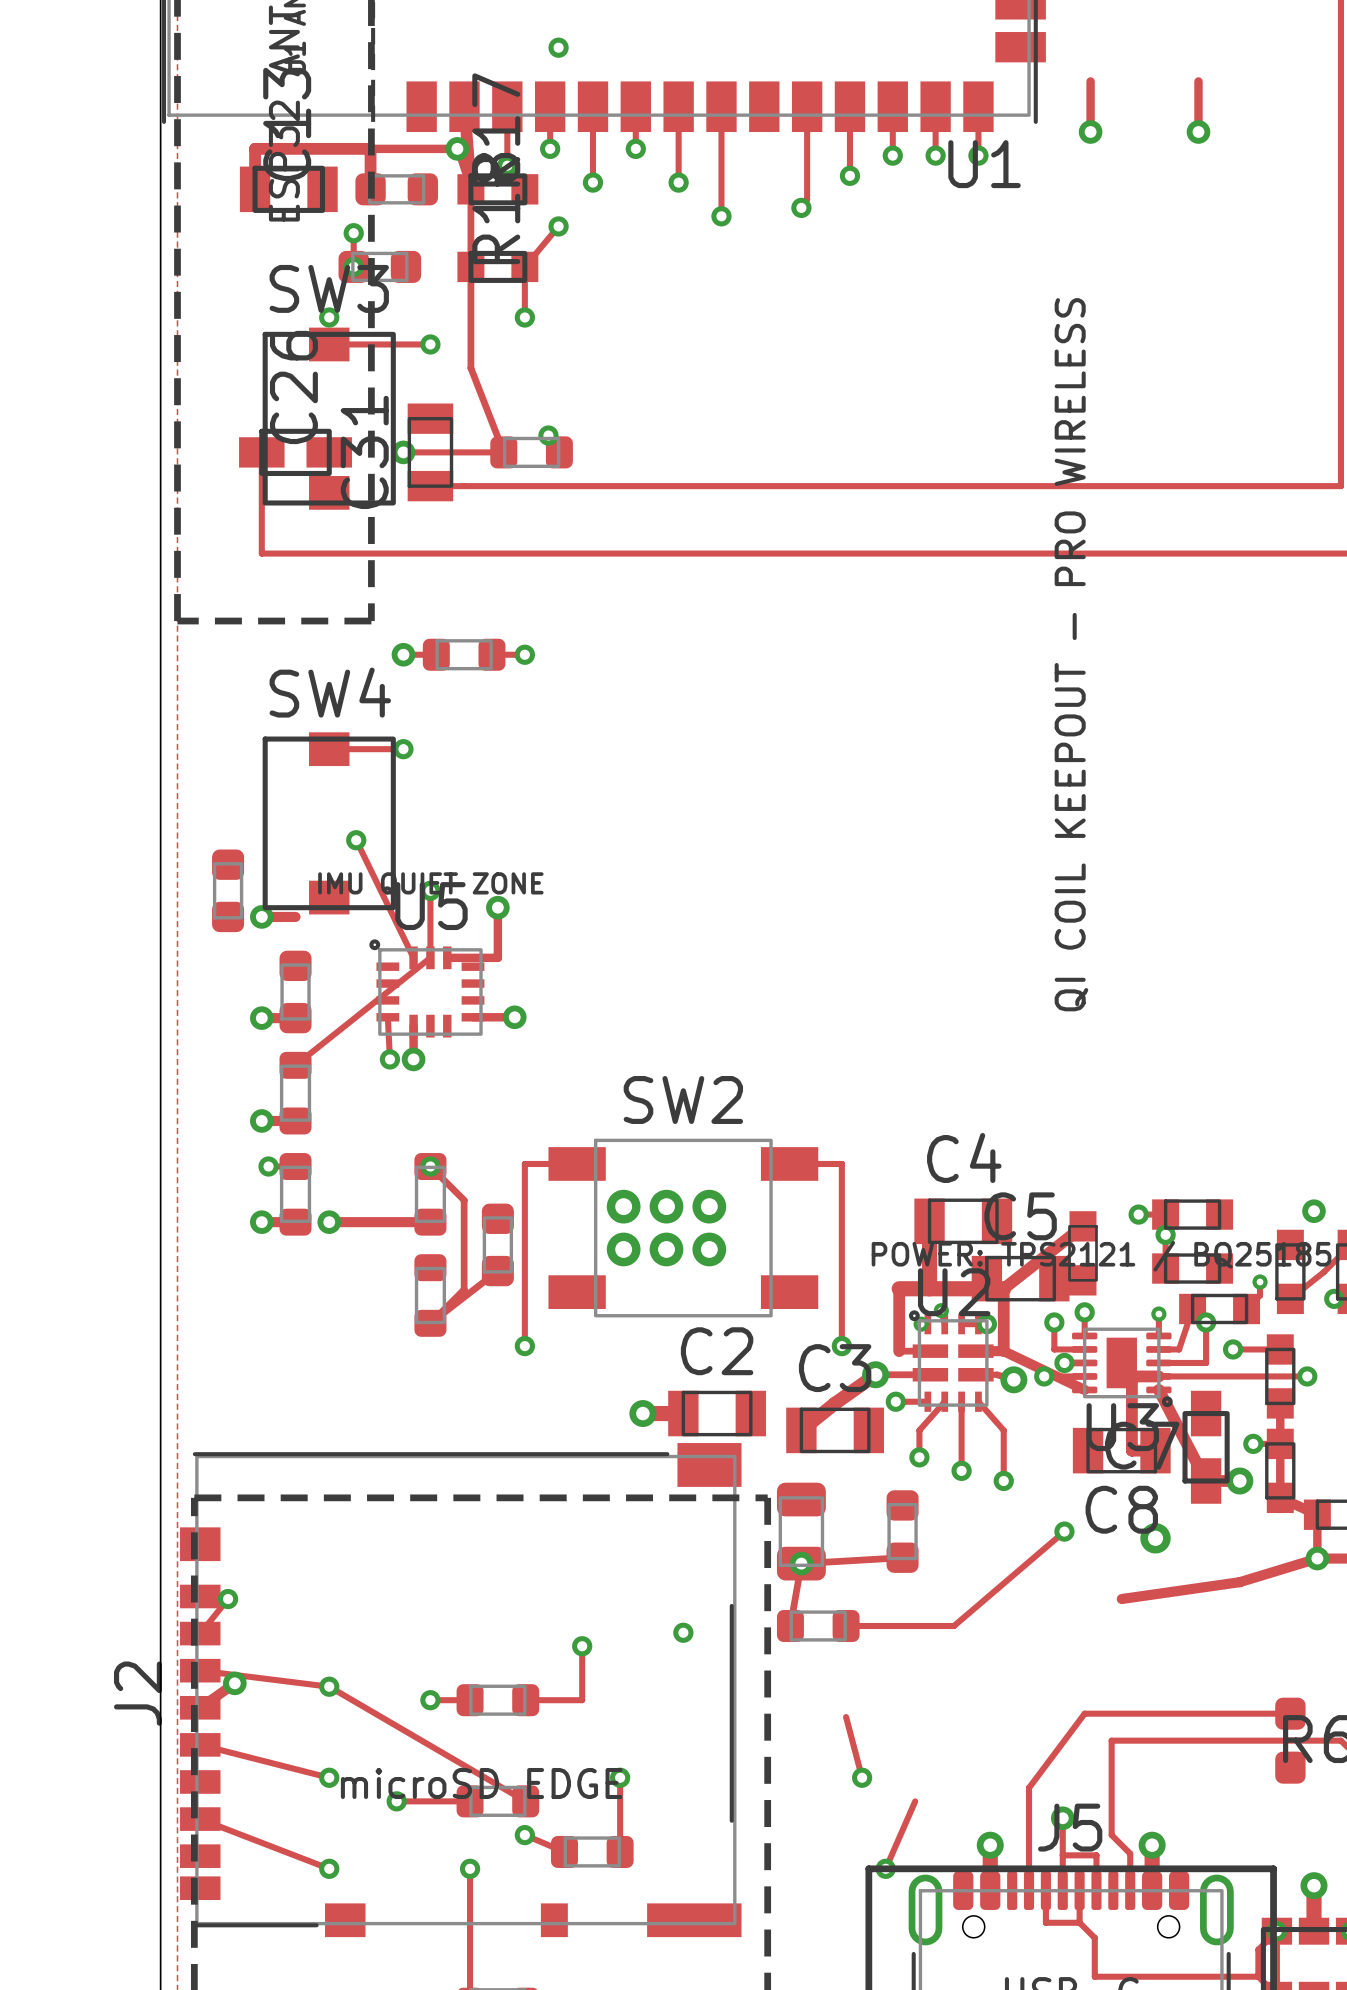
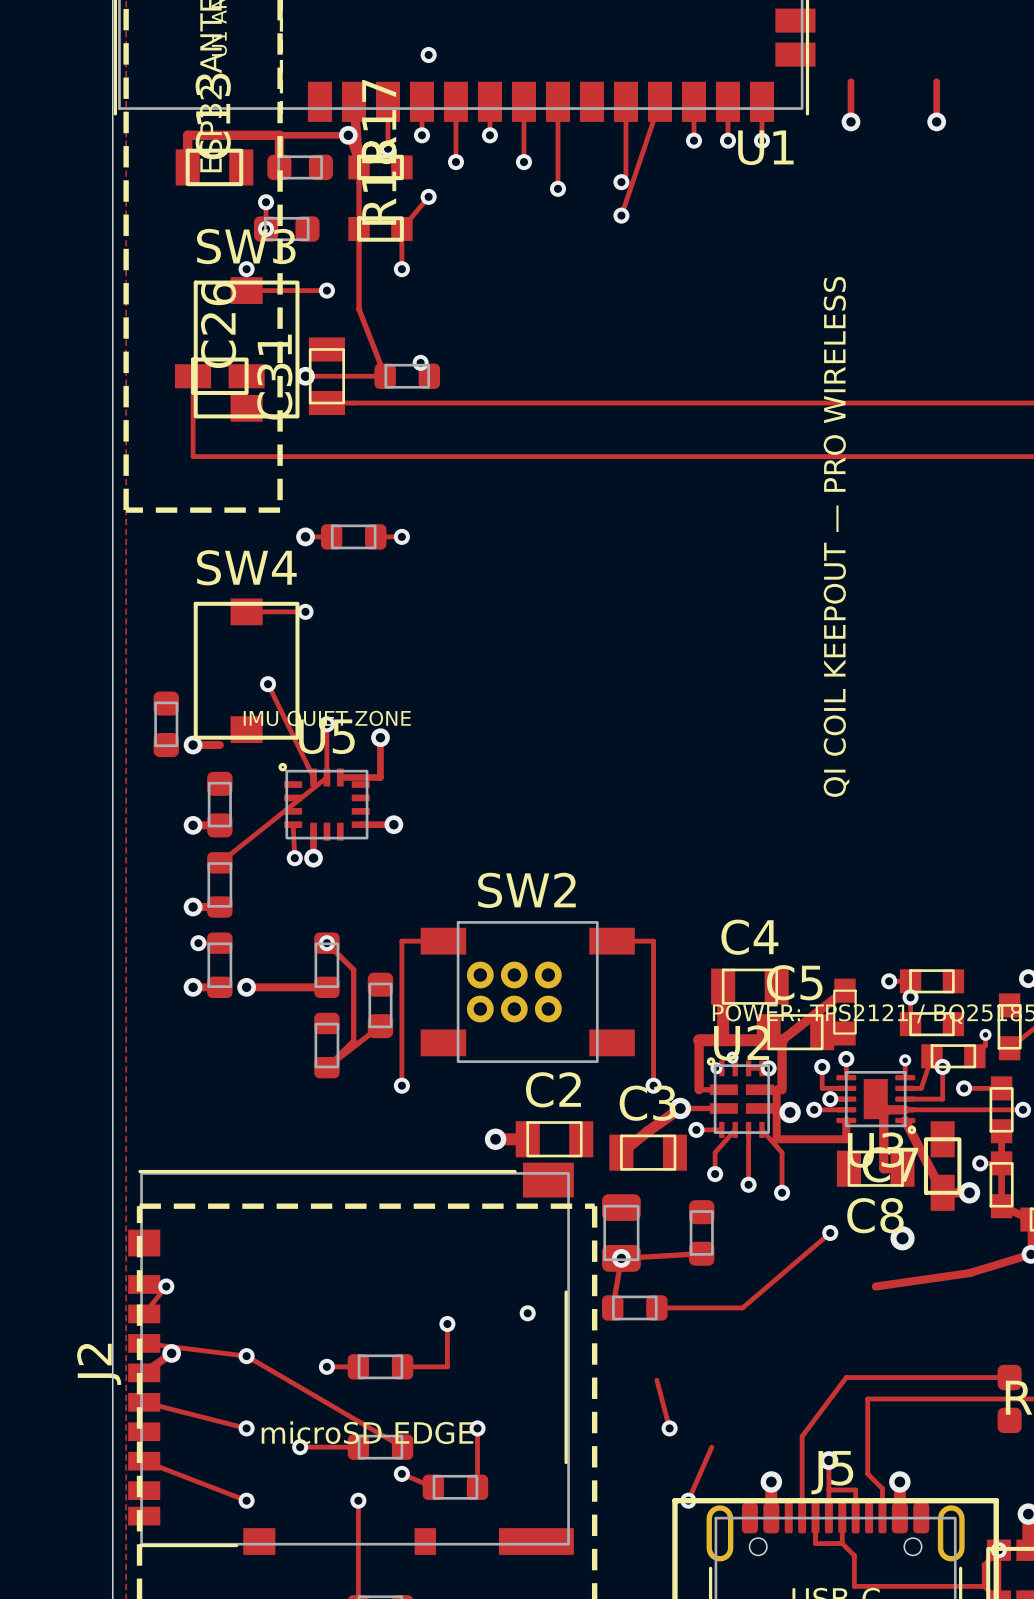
track: (849, 106) (849, 175) -> (659, 101) (621, 215)
via: (849, 175) -> none
via: none -> (621, 215)
track: (1003, 1351) (1084, 1389) -> (776, 1089) (776, 1139) (846, 1139) (846, 1120)

